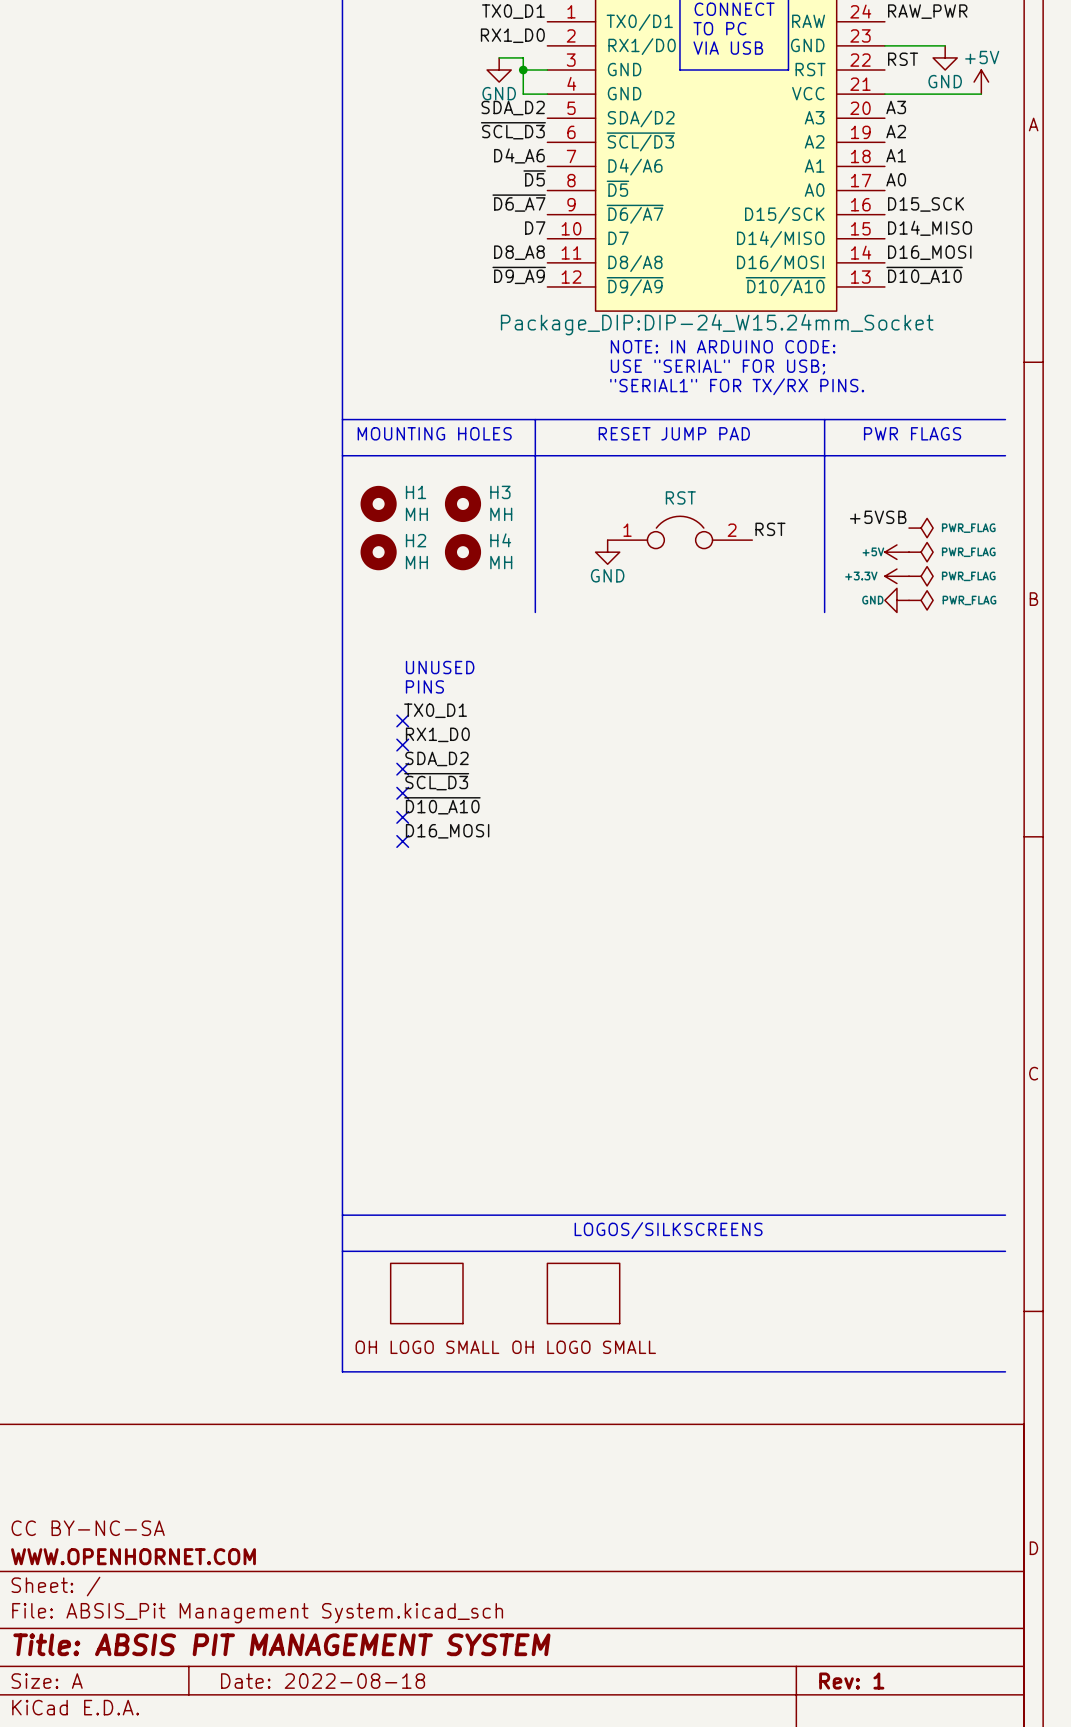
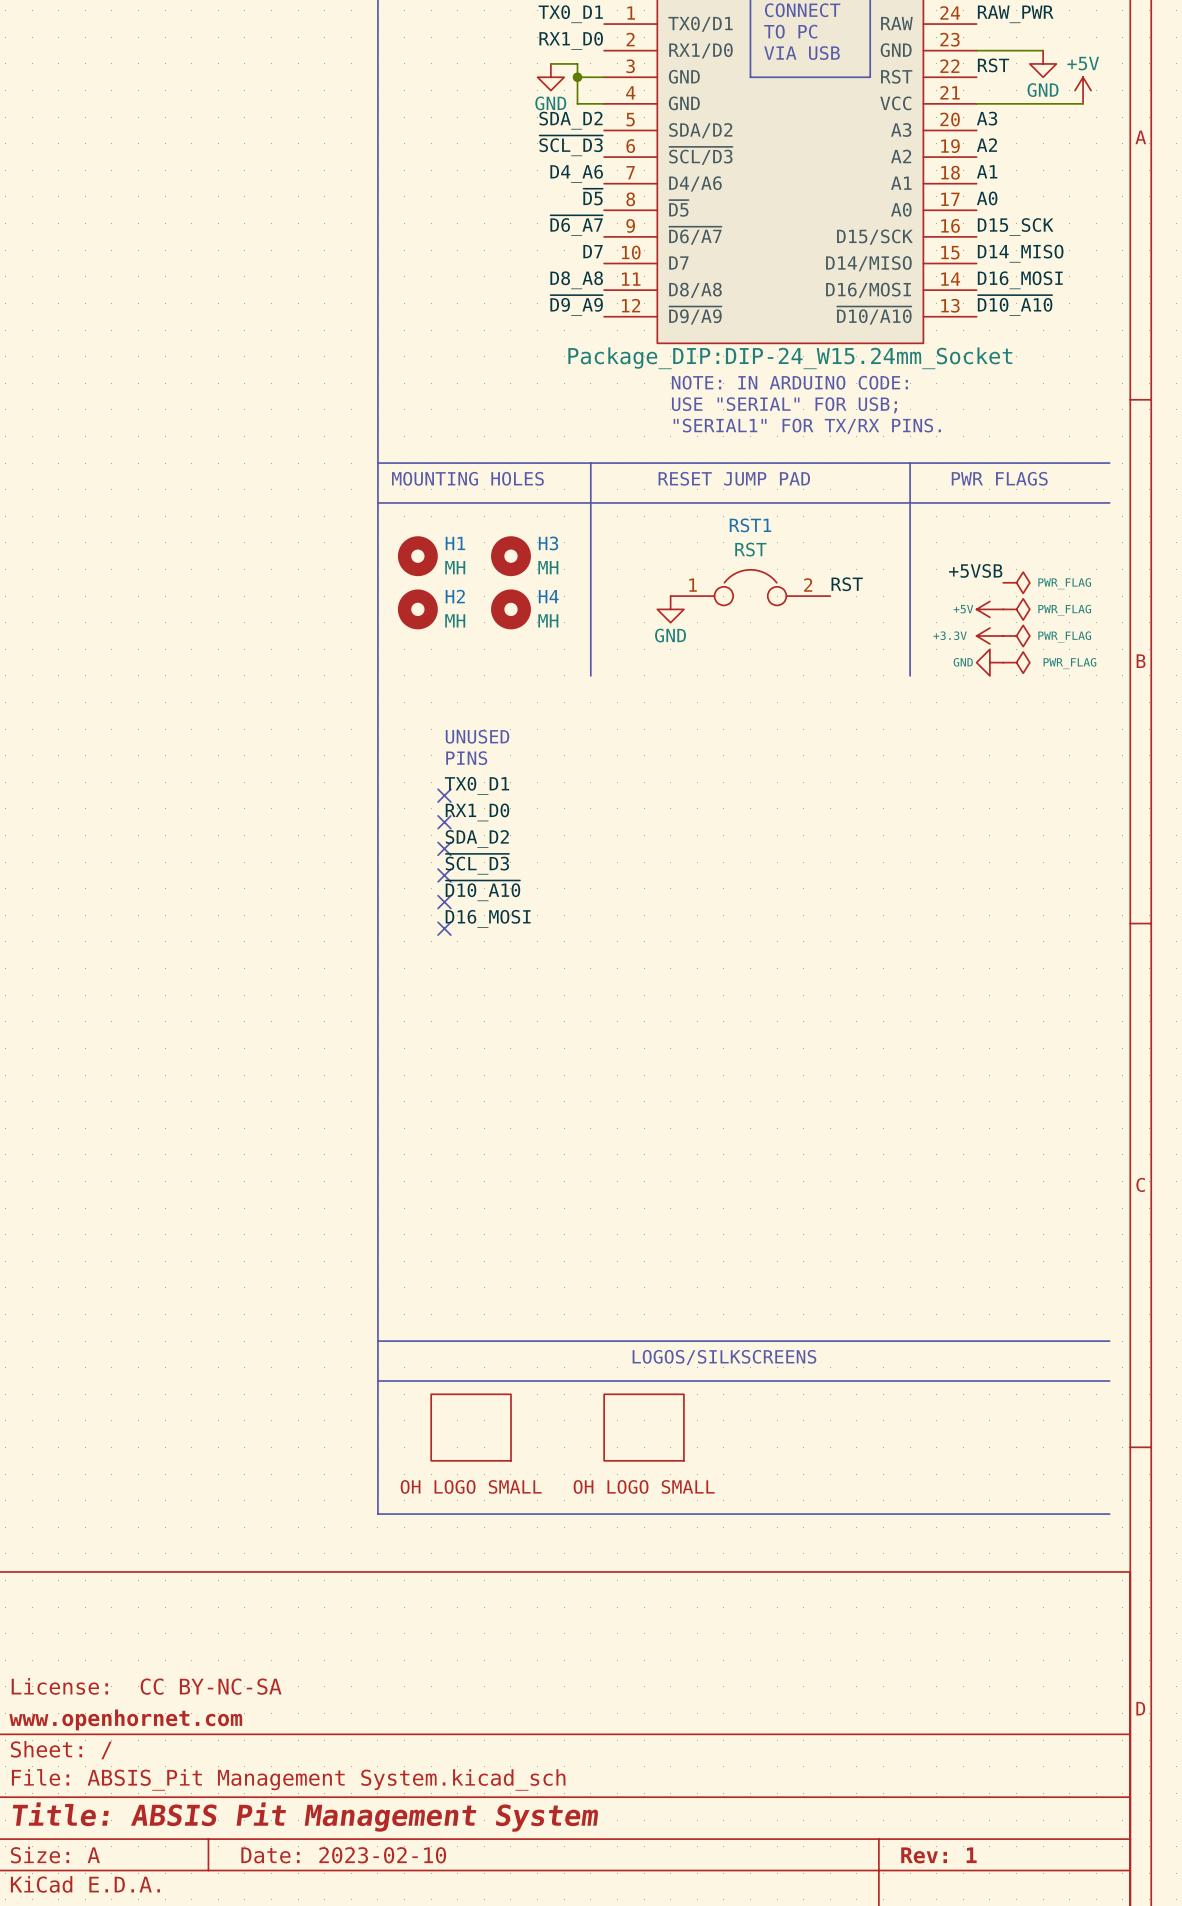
RST1 name: none -> RST1 (750, 525)
title block: CC BY-NC-SA (88, 1528) -> License: CC BY-NC-SA (146, 1686)
title block: WWW.OPENHORNET.COM (133, 1556) -> www.openhornet.com (125, 1719)
title block: Title: ABSIS PIT MANAGEMENT SYSTEM (281, 1644) -> Title: ABSIS Pit Management System (305, 1817)
title block: Date: 2022-08-18 (323, 1681) -> Date: 2023-02-10 (343, 1855)

